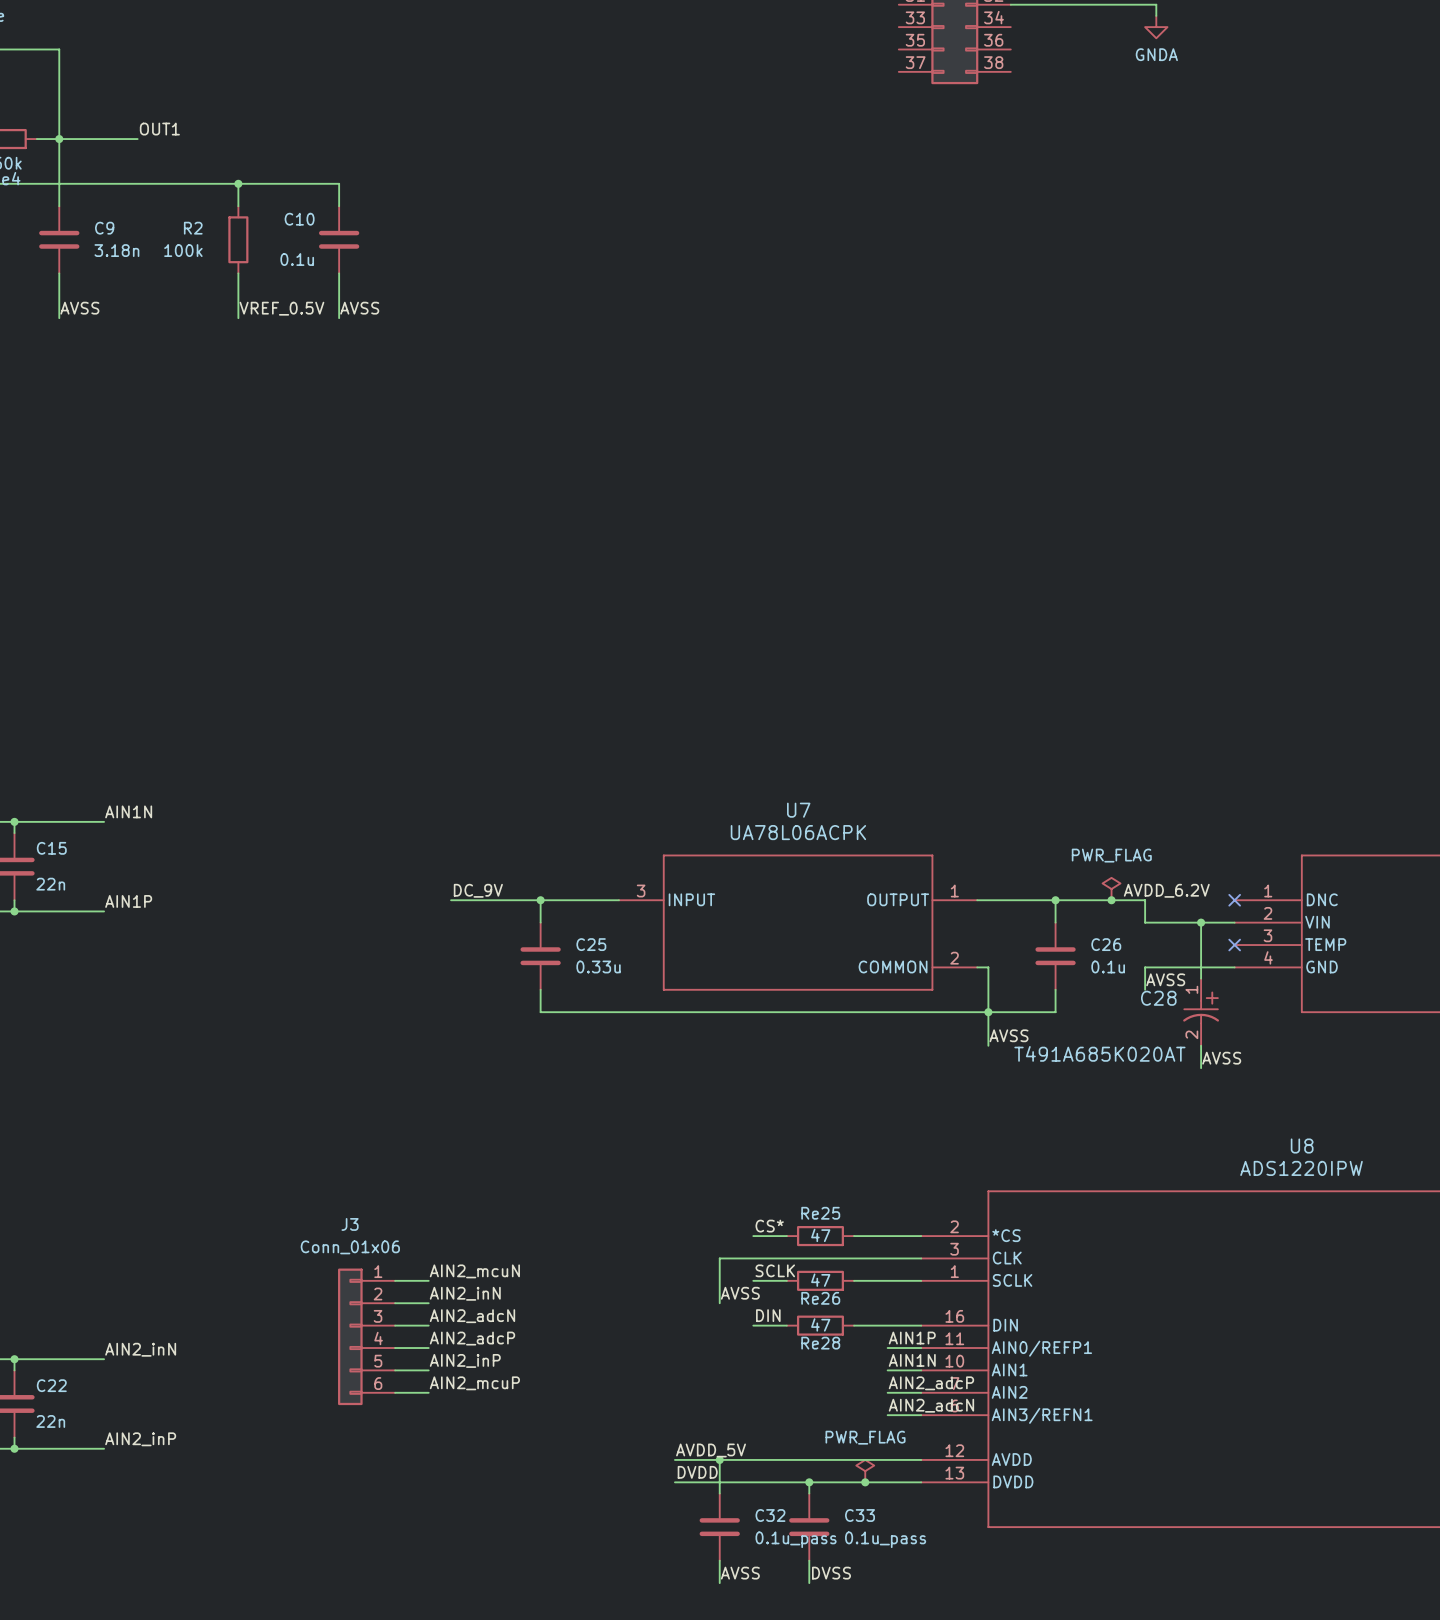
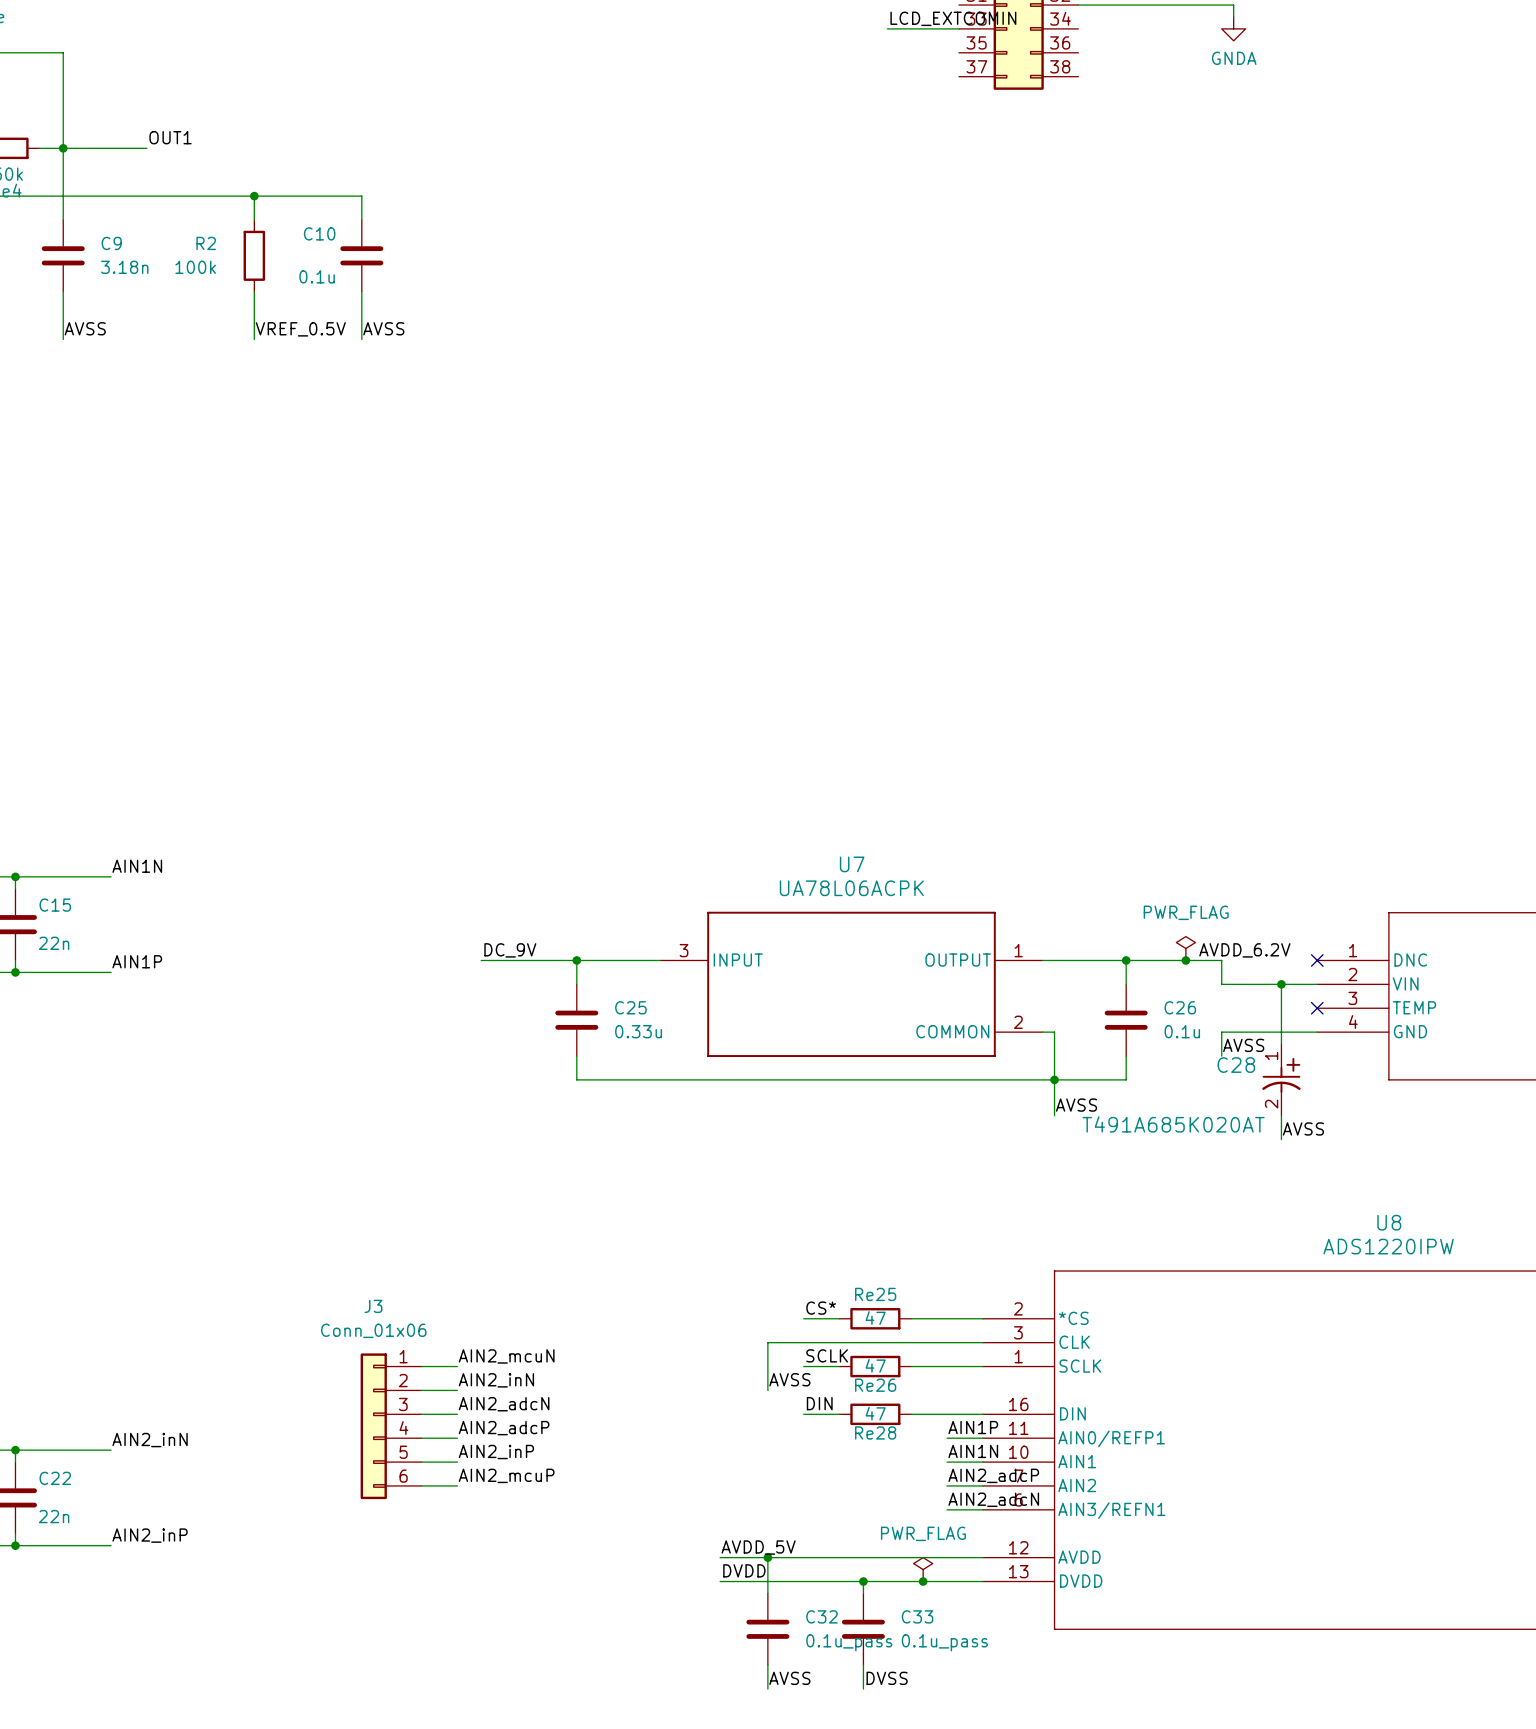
label: none -> LCD_EXTCOMIN (953, 18)
wire: none -> (887, 28) (958, 28)

